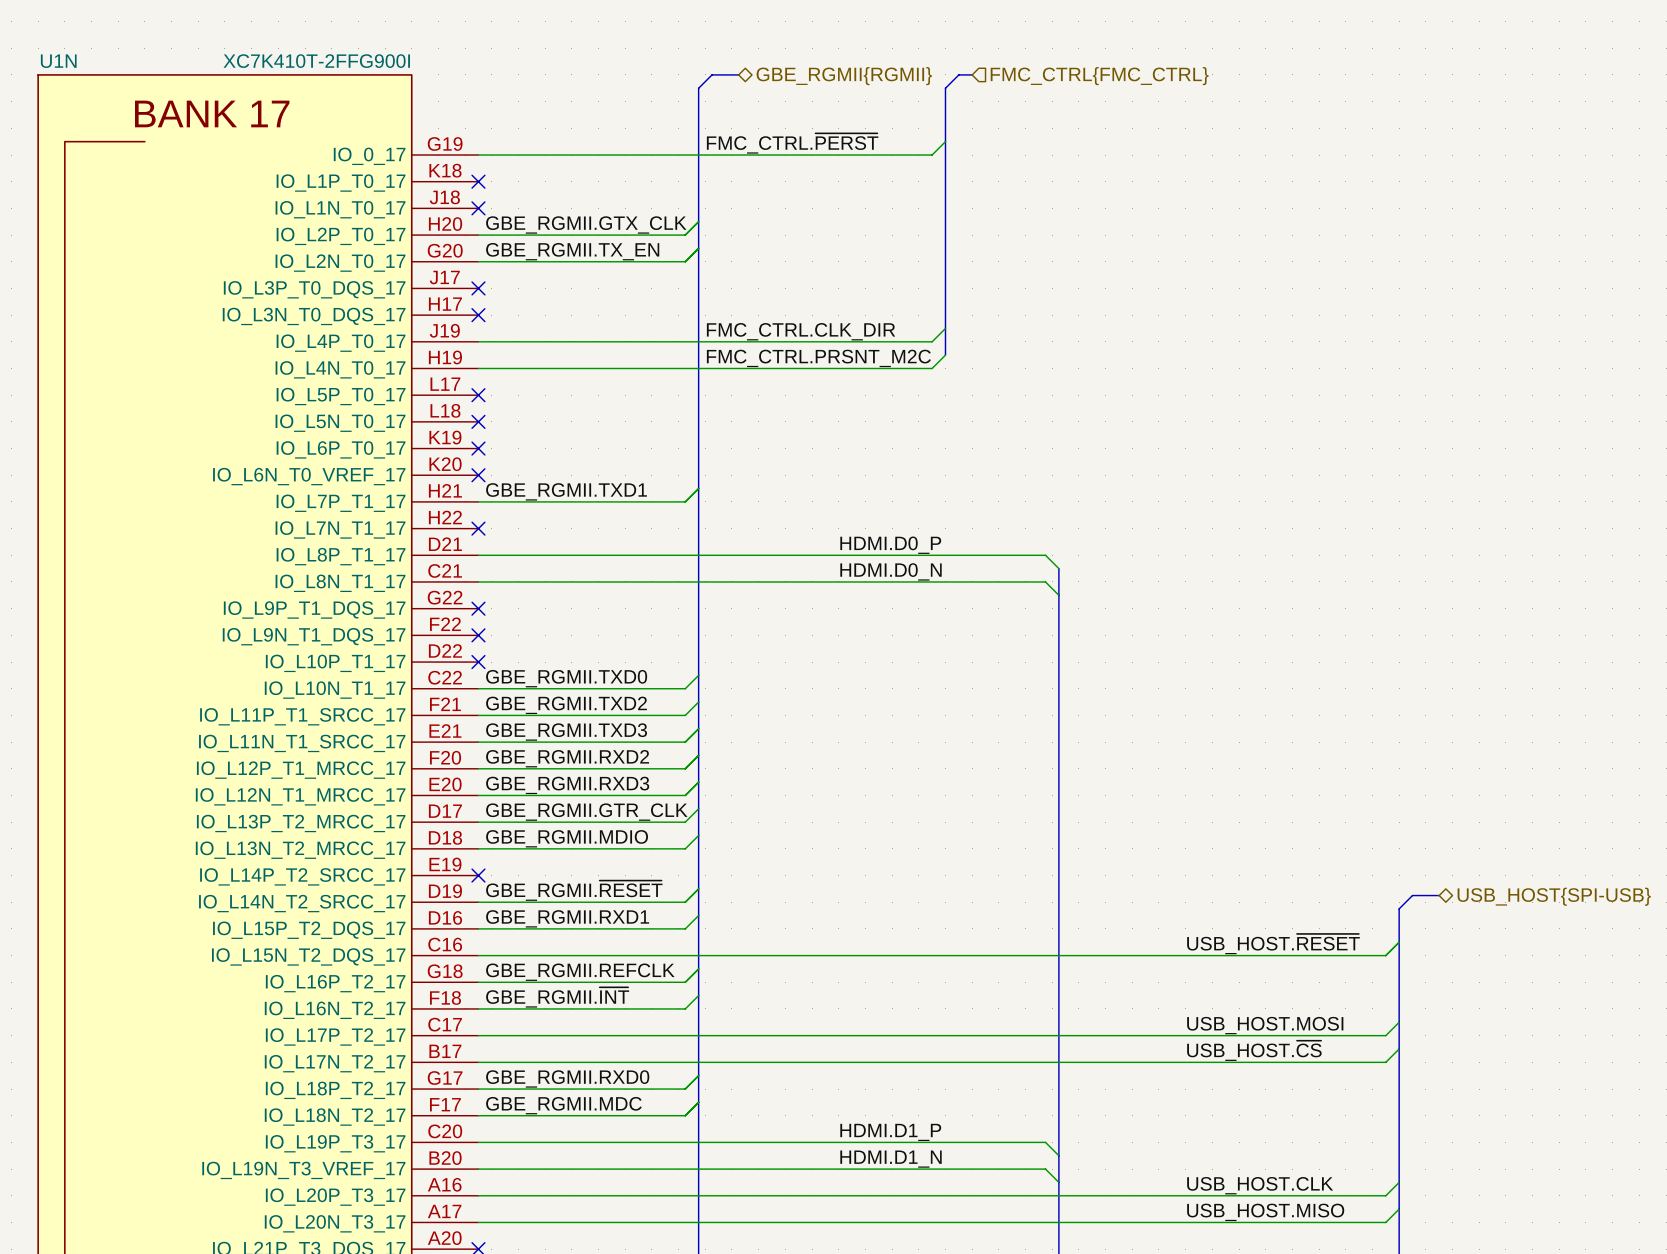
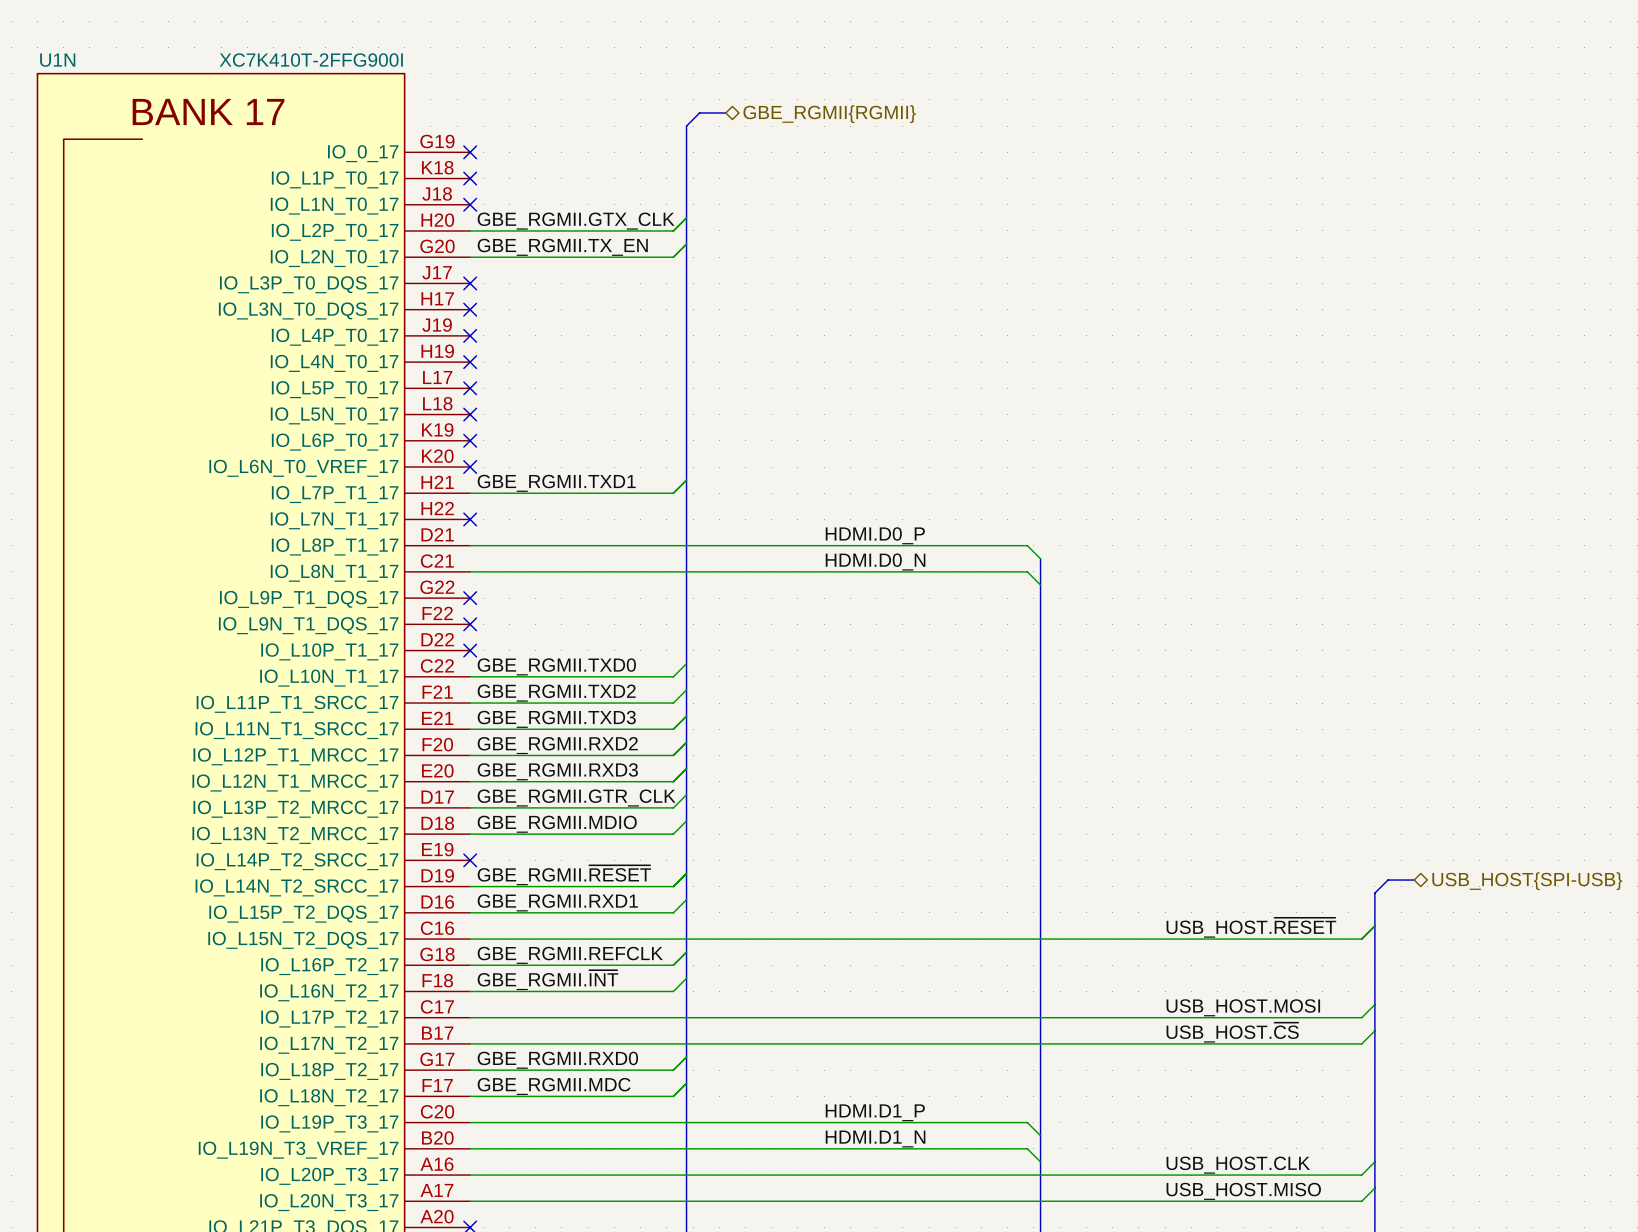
bus: (738, 74) (711, 74) (698, 88) (698, 128) -> (725, 112) (699, 112) (686, 126)
bus: (972, 74) (958, 74) (945, 88) (945, 355) -> none
hierarchical label position: GBE_RGMII{RGMII} (844, 76) -> GBE_RGMII{RGMII} (829, 114)
hierarchical label: FMC_CTRL{FMC_CTRL} (1099, 76) -> none
wire: (945, 141) (932, 155) (478, 155) -> none
label: FMC_CTRL.~{PERST} (792, 143) -> none
no-connect mark: none -> (470, 152)
wire: (945, 328) (932, 341) (478, 341) -> none
label: FMC_CTRL.CLK_DIR (801, 331) -> none
no-connect mark: none -> (470, 335)
wire: (945, 355) (932, 368) (478, 368) -> none
label: FMC_CTRL.PRSNT_M2C (818, 358) -> none
no-connect mark: none -> (470, 362)

